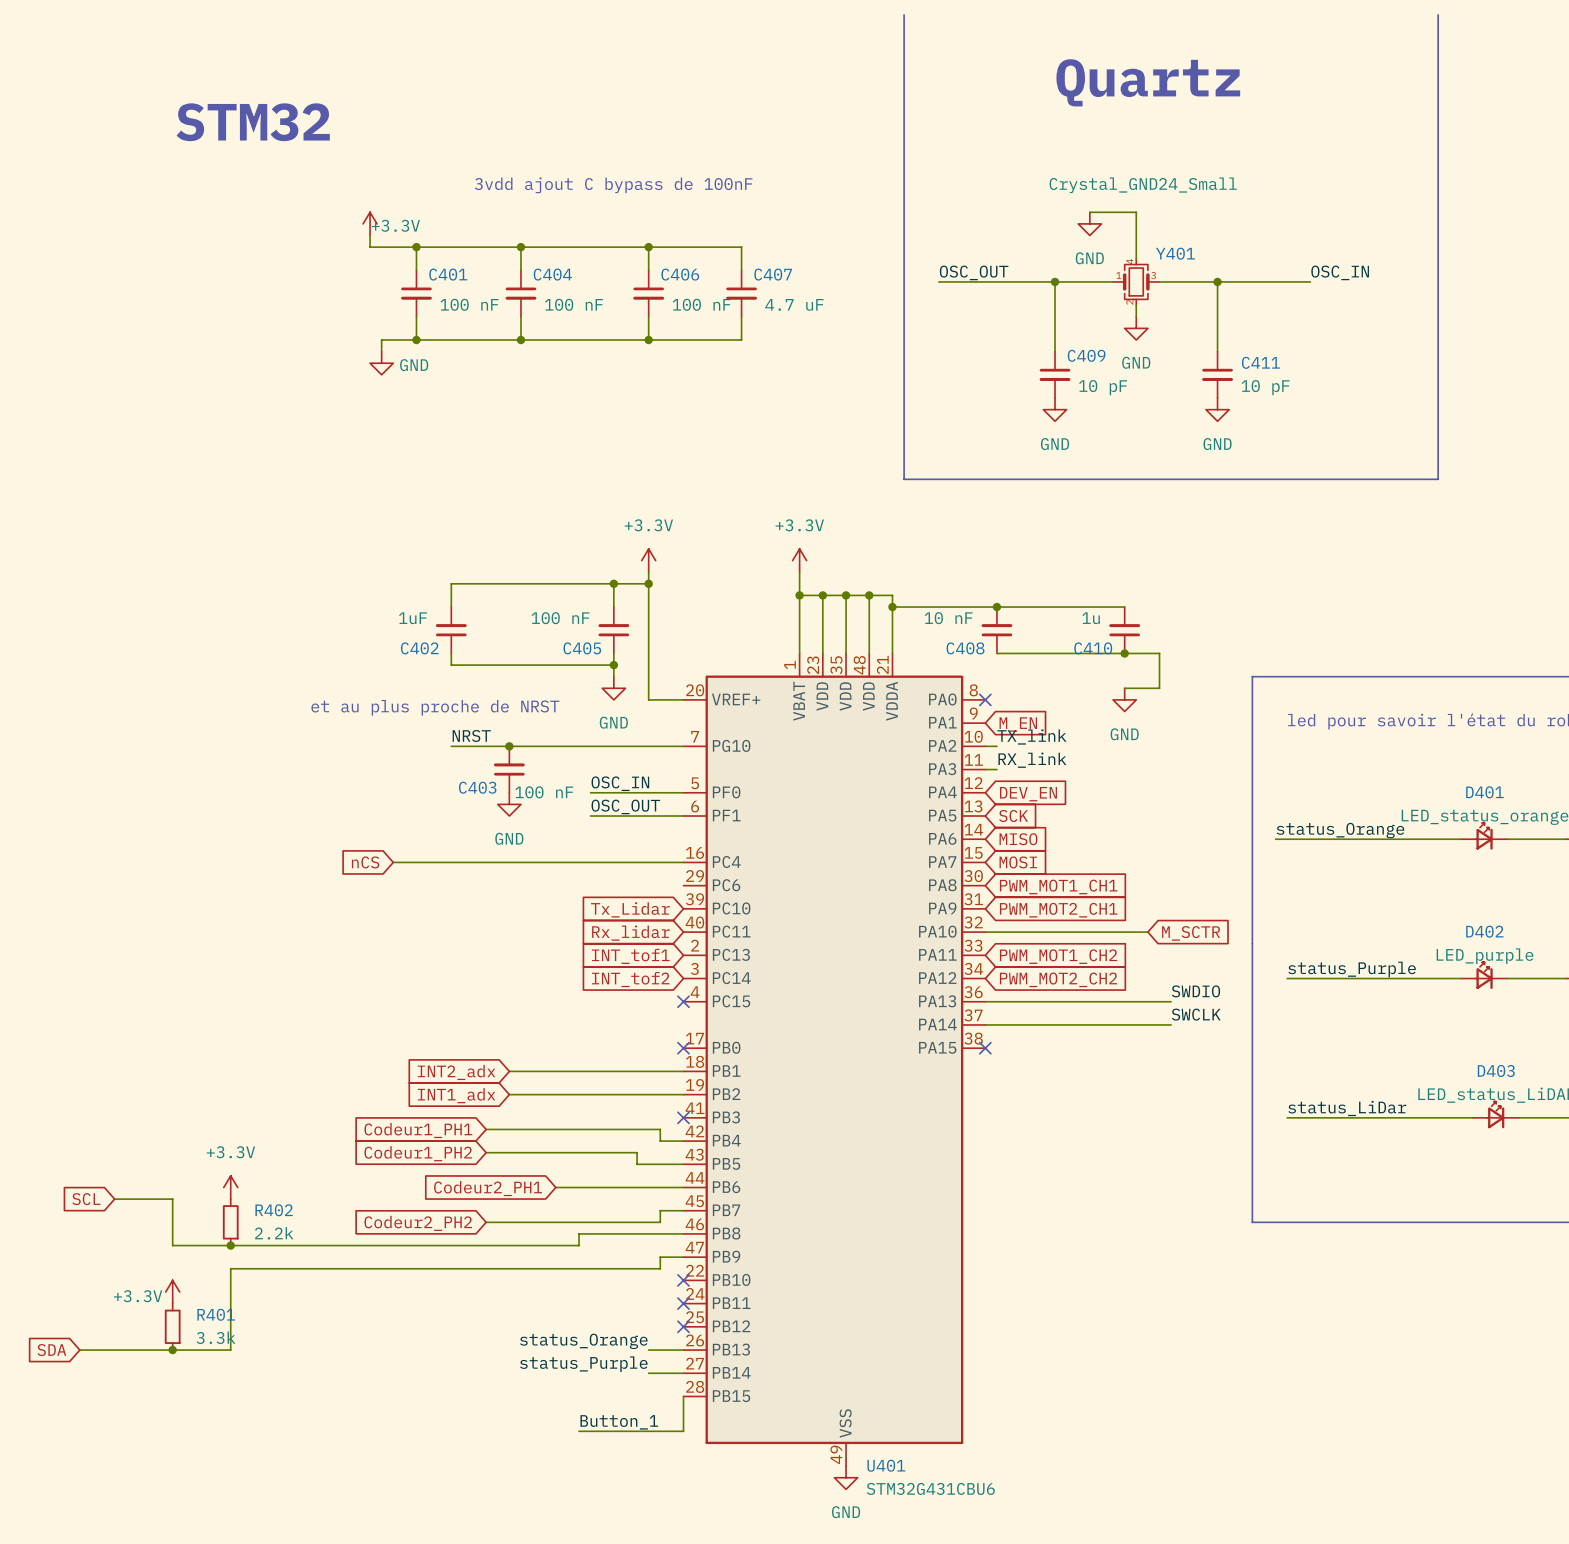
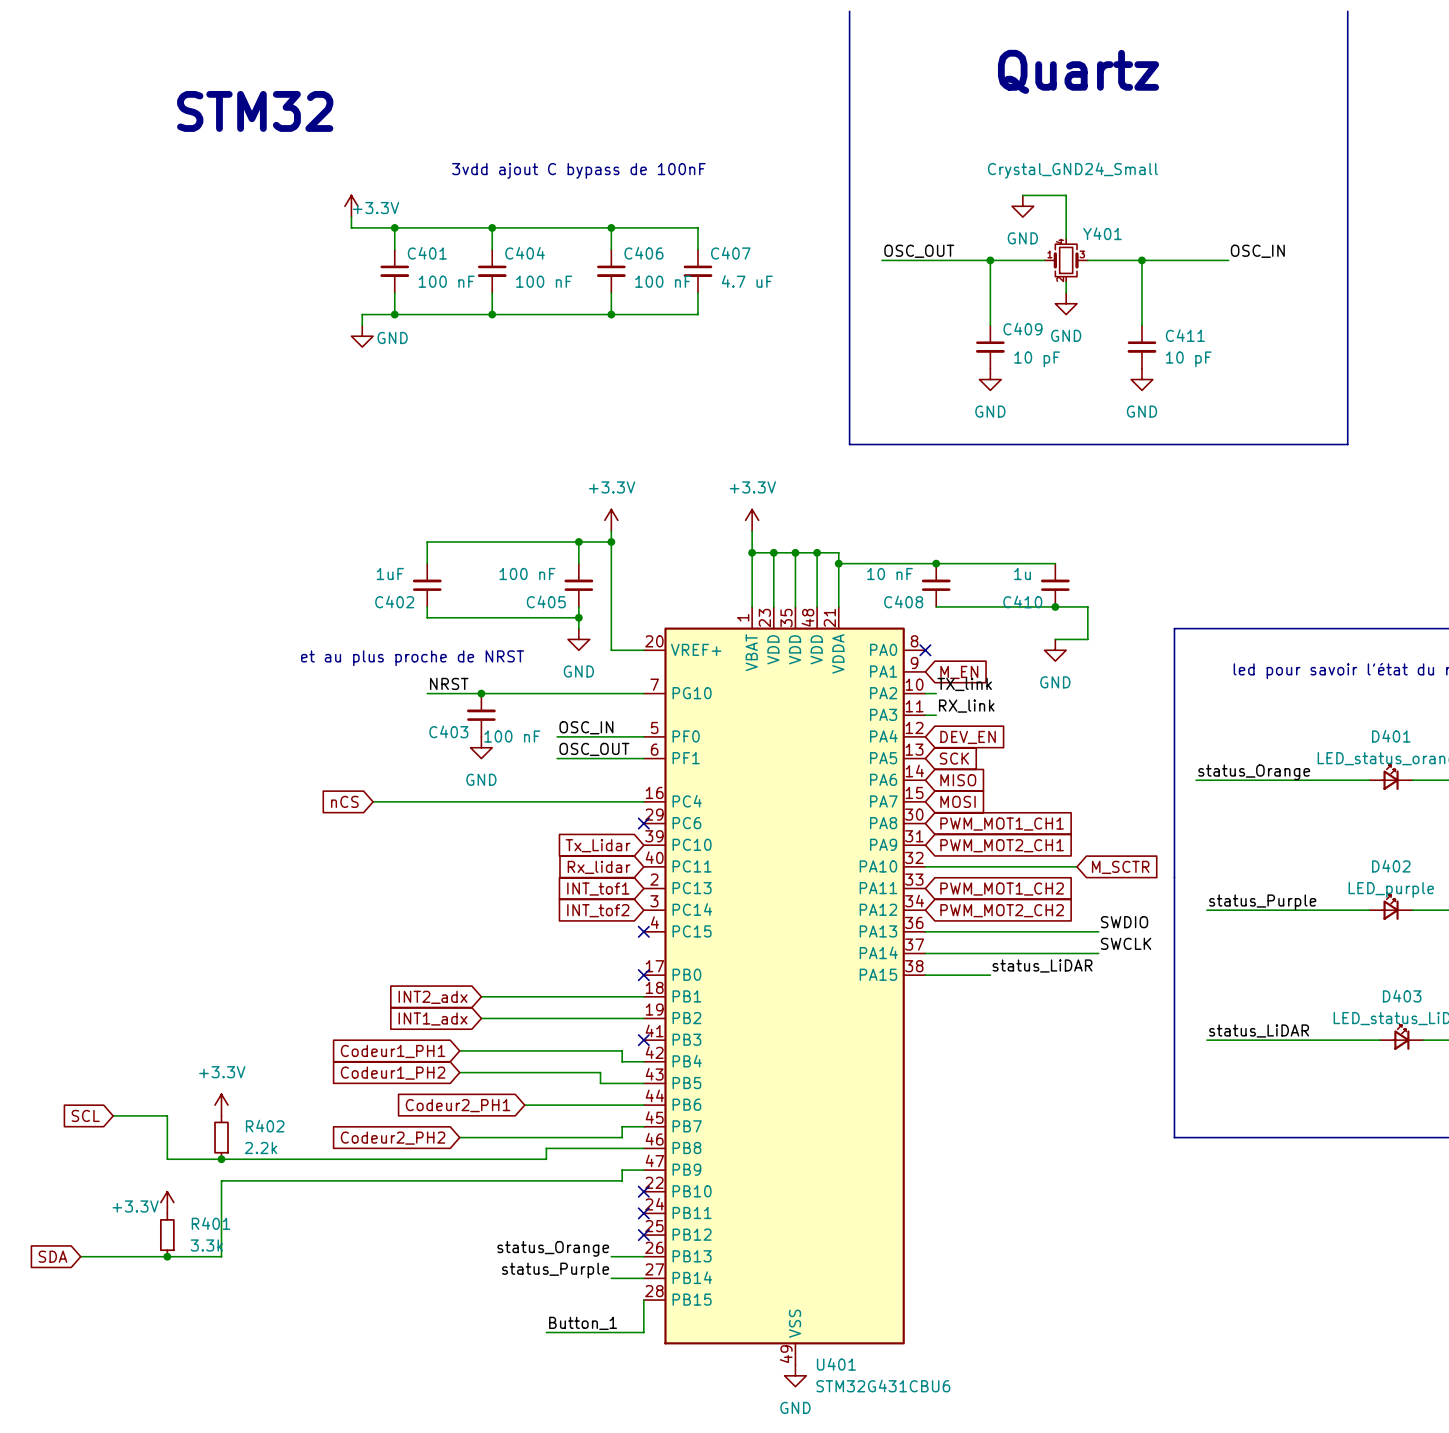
no-connect mark: none -> (643, 823)
label: none -> status_LiDAR (1042, 966)
wire: none -> (925, 975) (990, 975)
no-connect mark: (985, 1048) -> none
label: status_LiDar (1347, 1108) -> status_LiDAR (1259, 1030)

